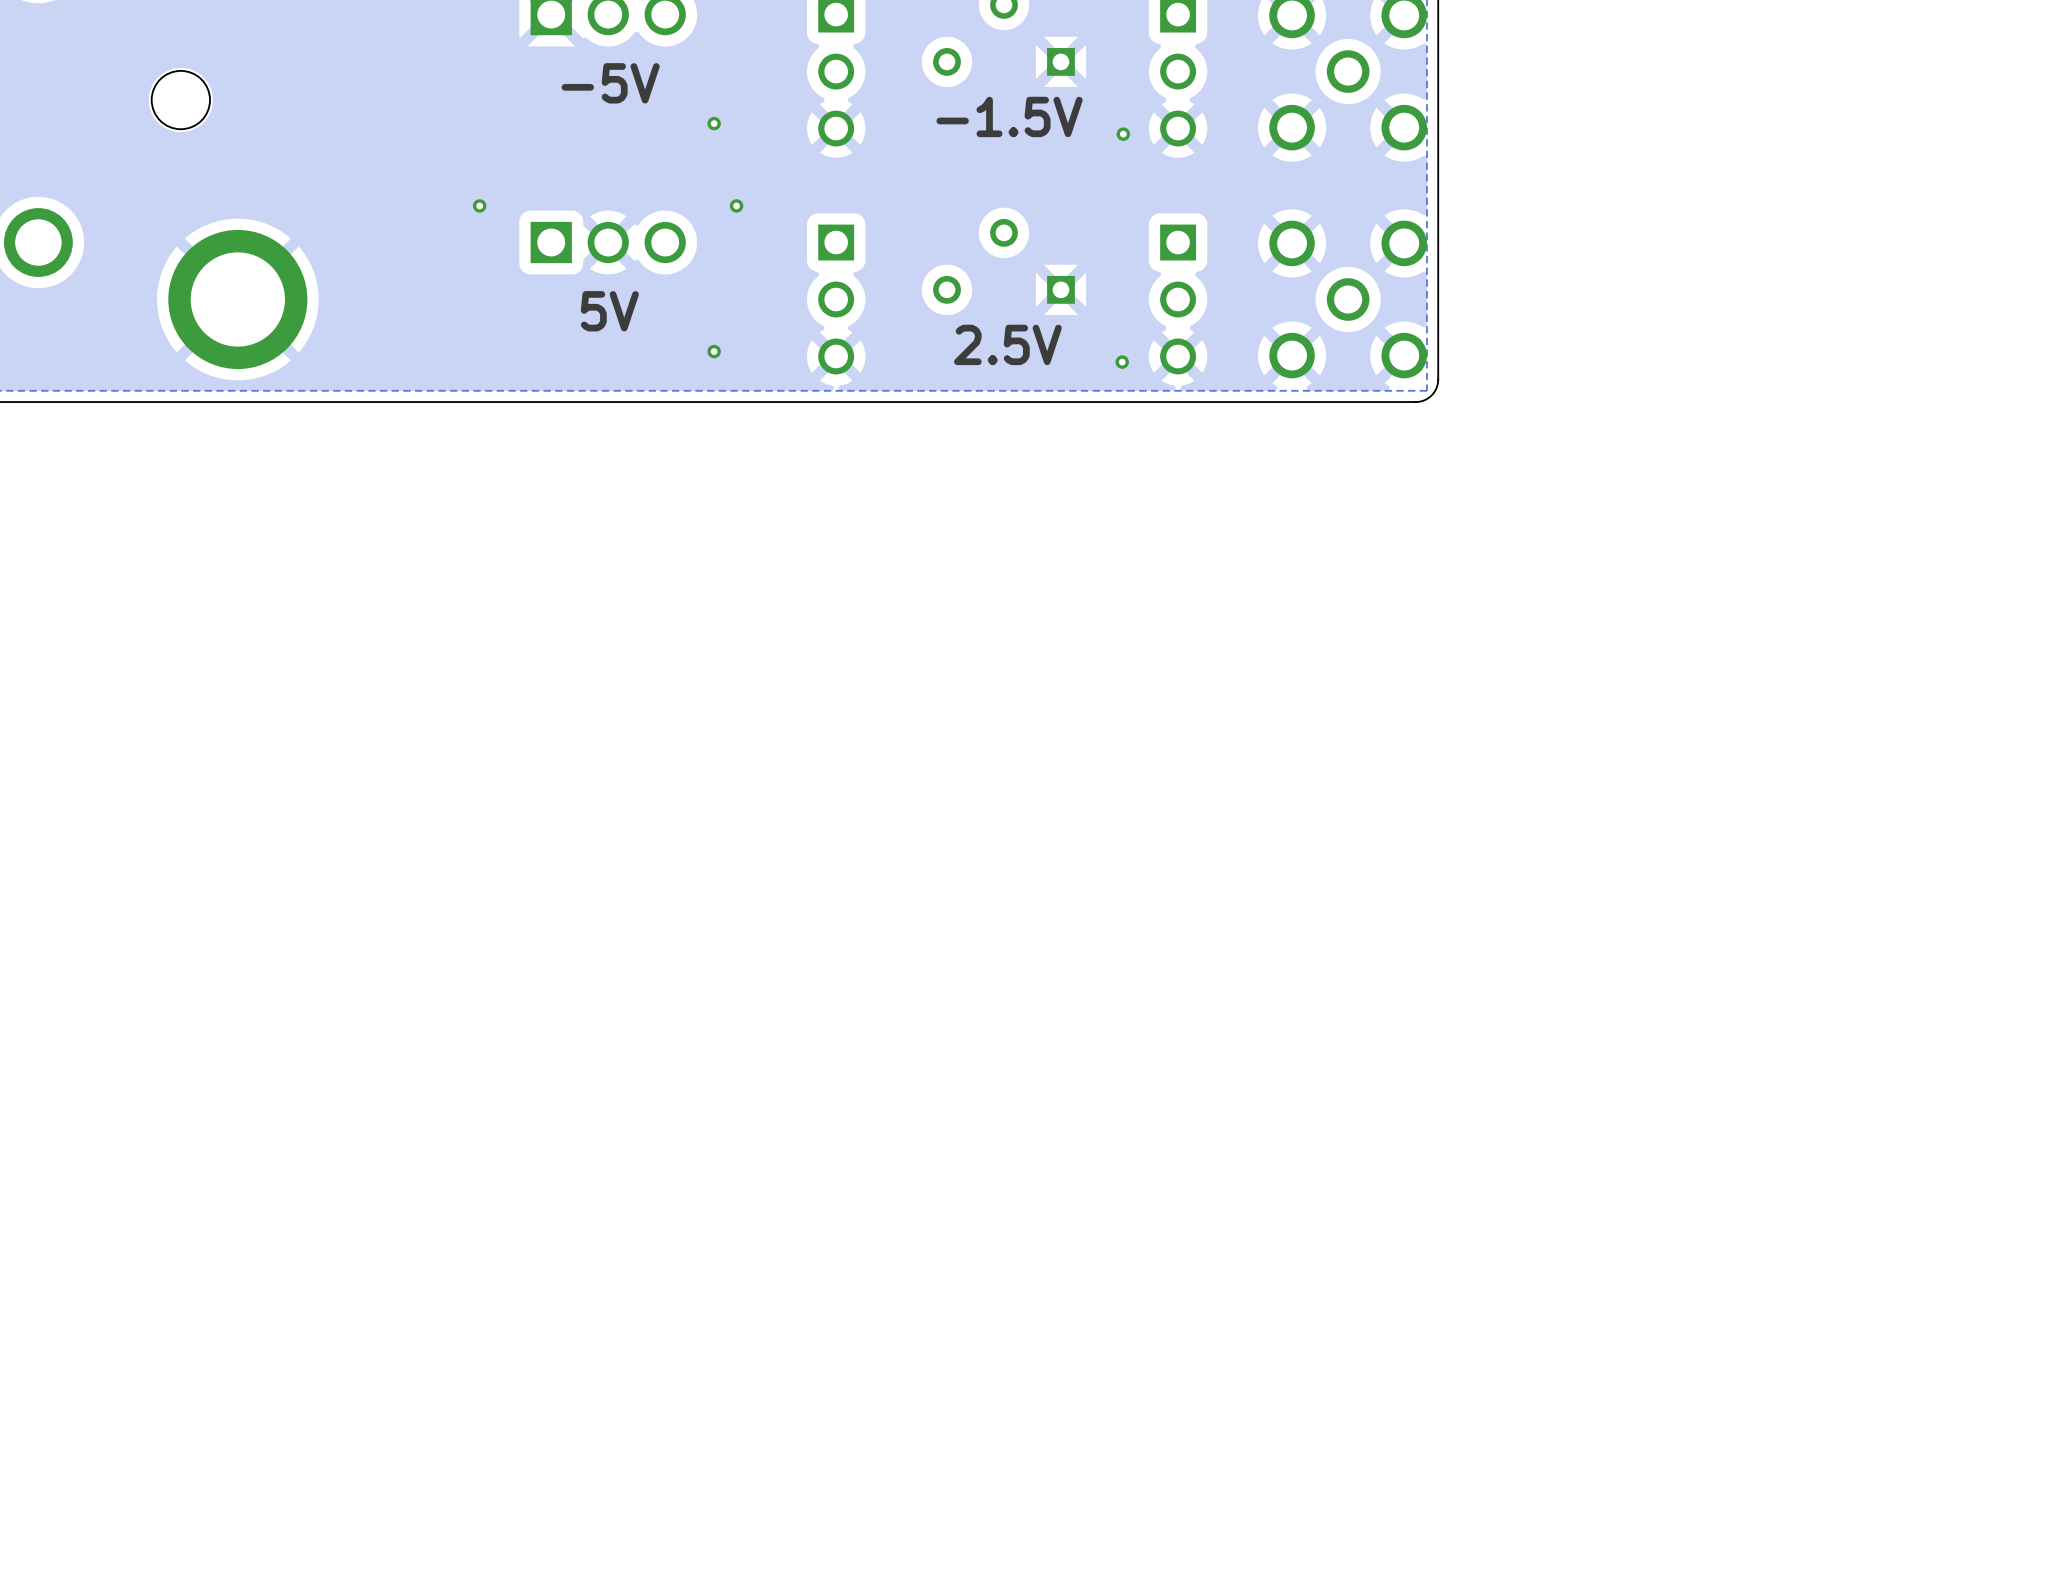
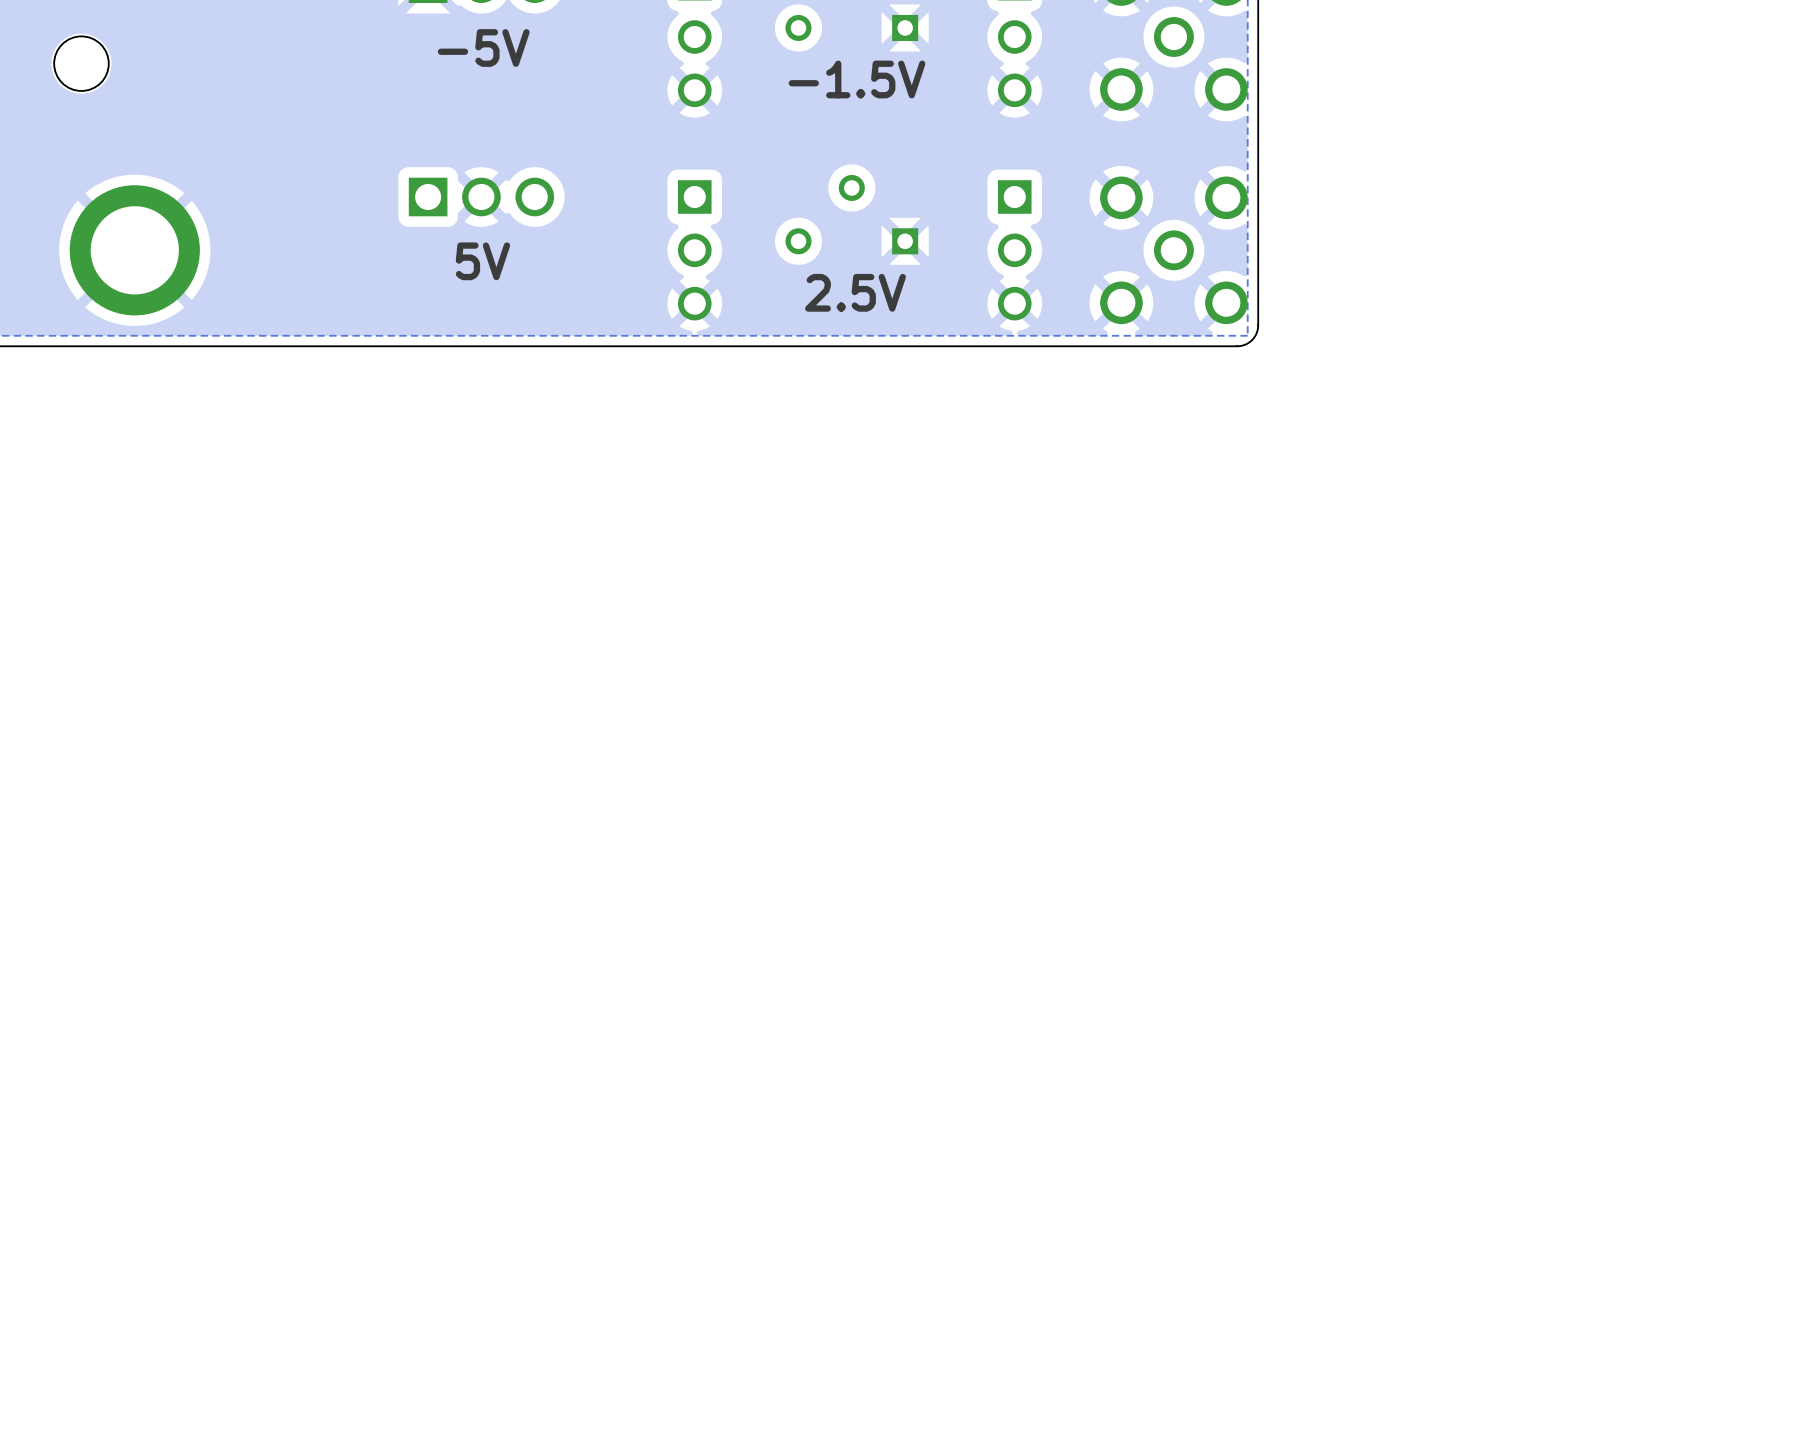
via: (714, 123) -> none
via: (1123, 134) -> none
via: (479, 205) -> none
via: (736, 205) -> none
via: (714, 351) -> none
via: (1122, 362) -> none

